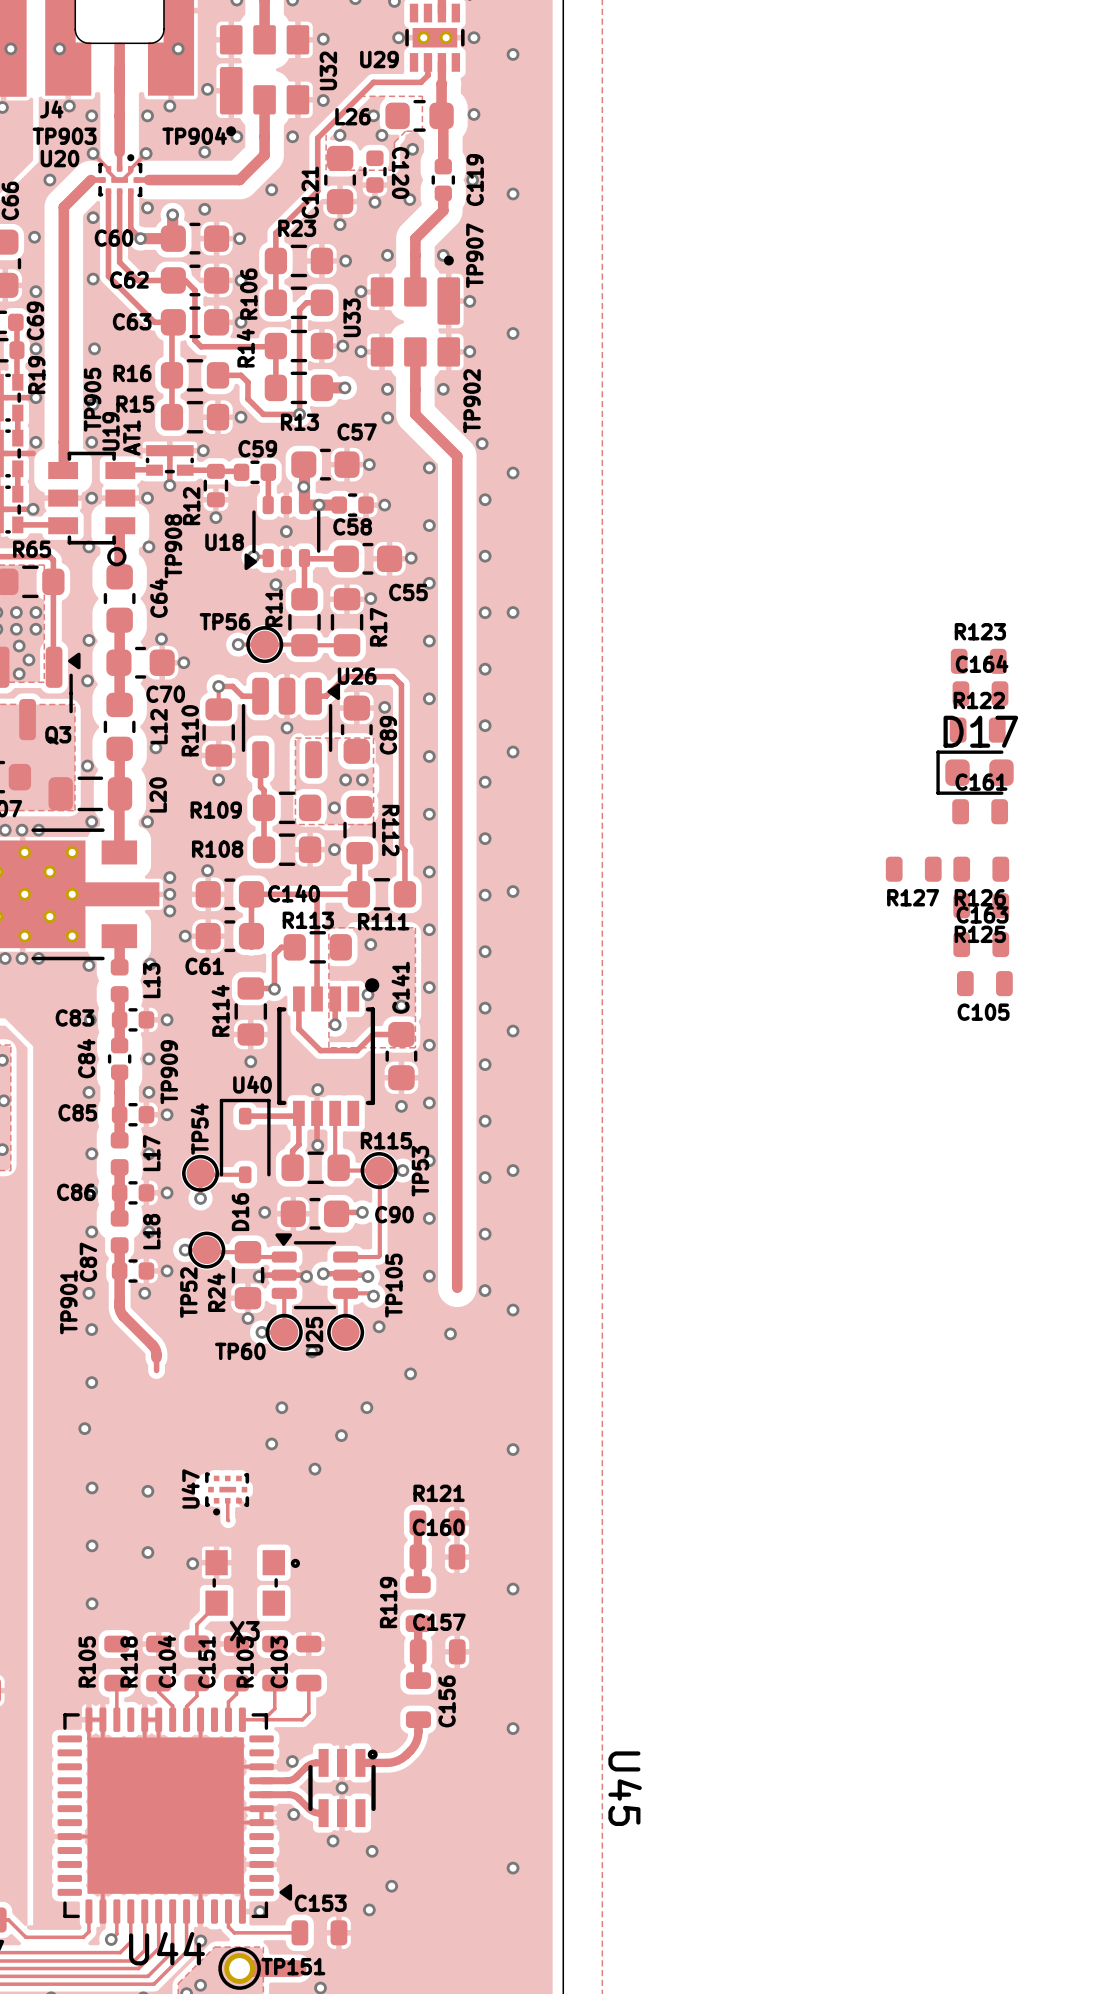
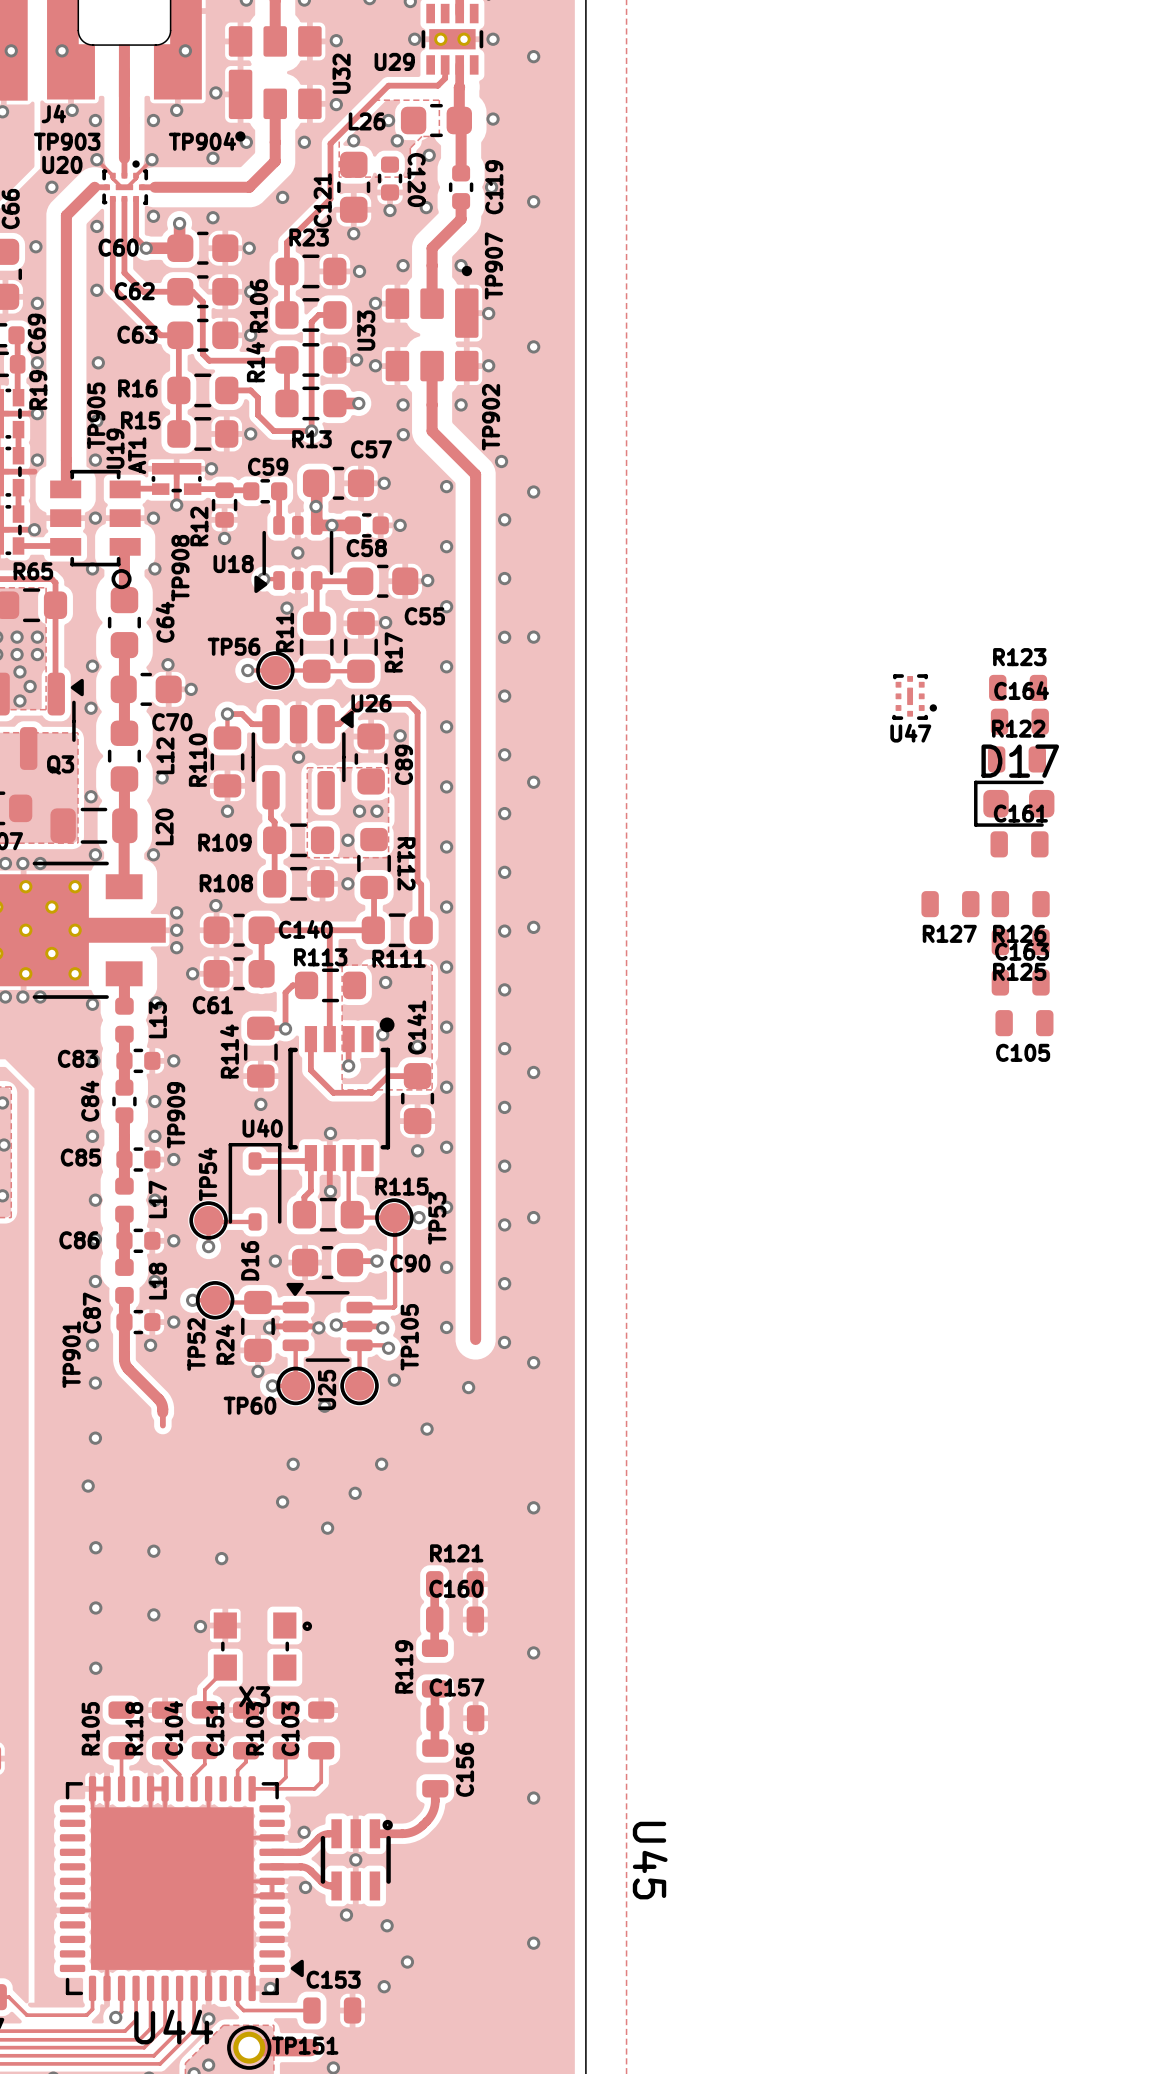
U47 rotation: 0° (227, 1493) -> 90° counterclockwise (914, 697)
U47 position: (227, 1493) -> (914, 697)
via: none -> (221, 1558)
track: (227, 1500) (228, 1520) -> none

